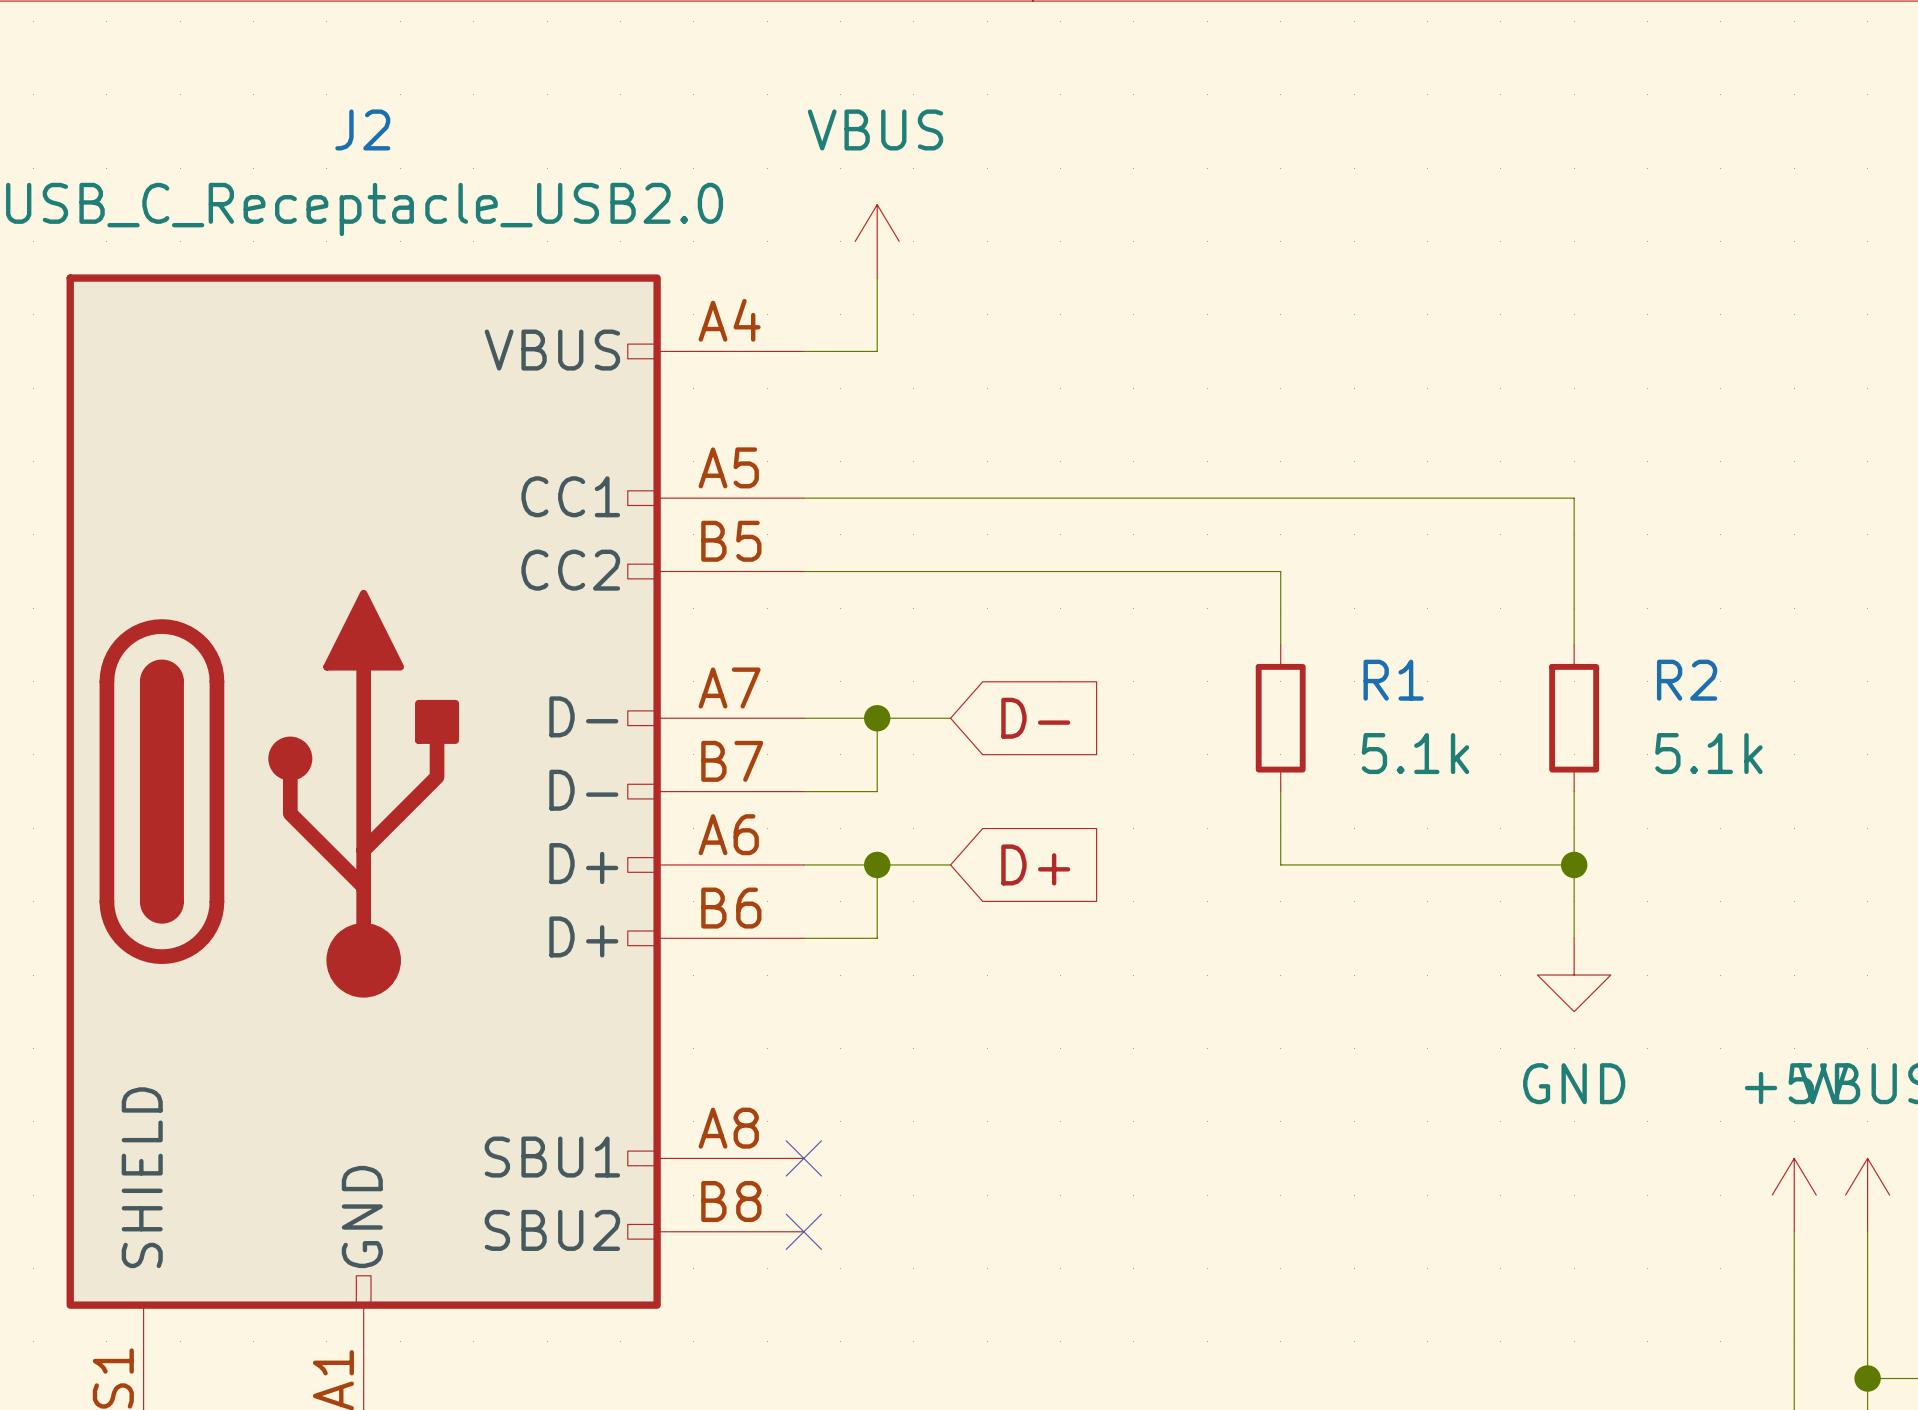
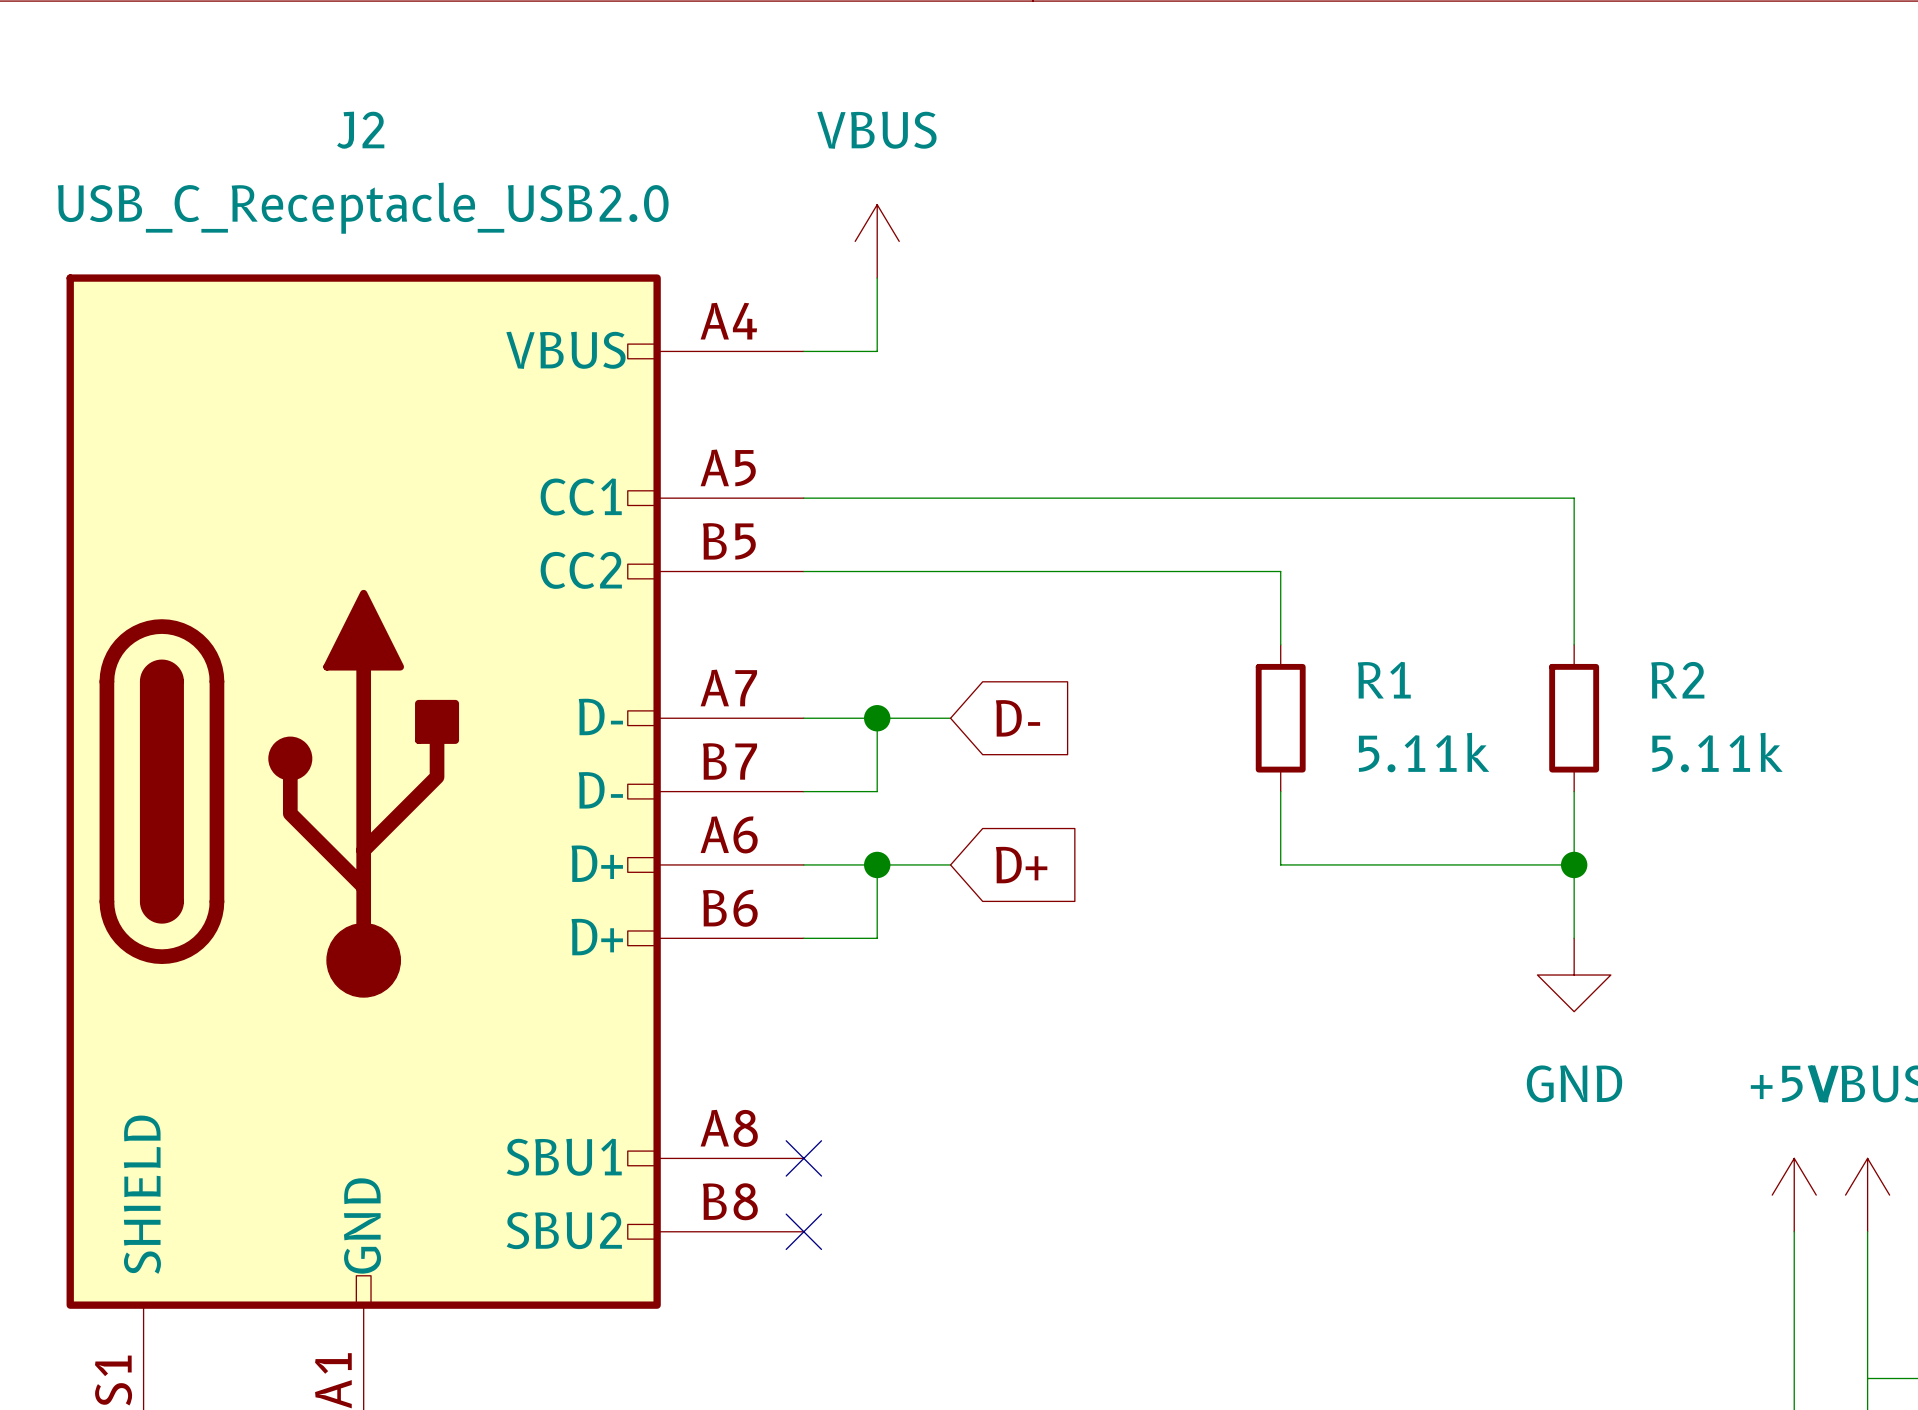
R1 value: 5.1k (1415, 753) -> 5.11k (1424, 752)
R2 value: 5.1k (1708, 753) -> 5.11k (1717, 752)
junction: (1867, 1378) -> none

